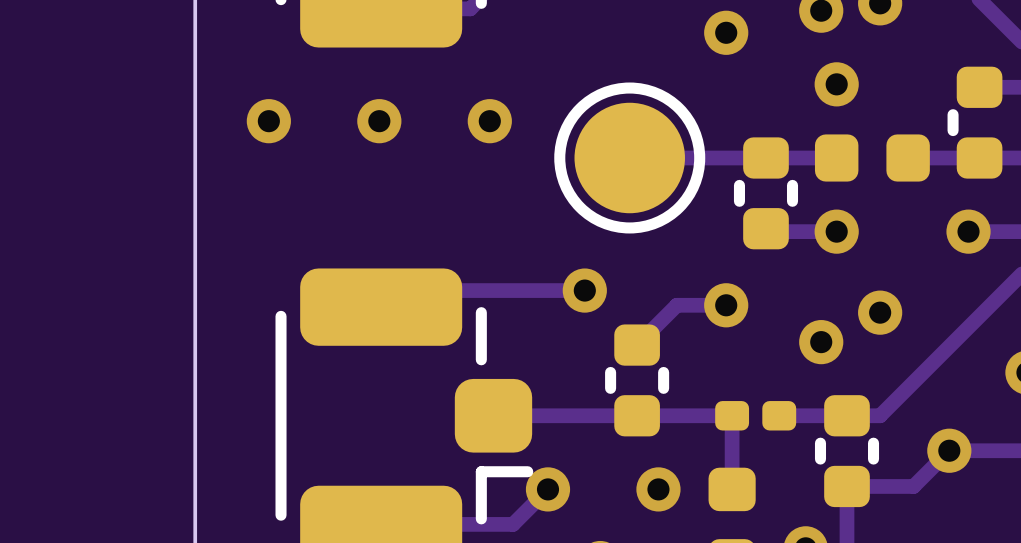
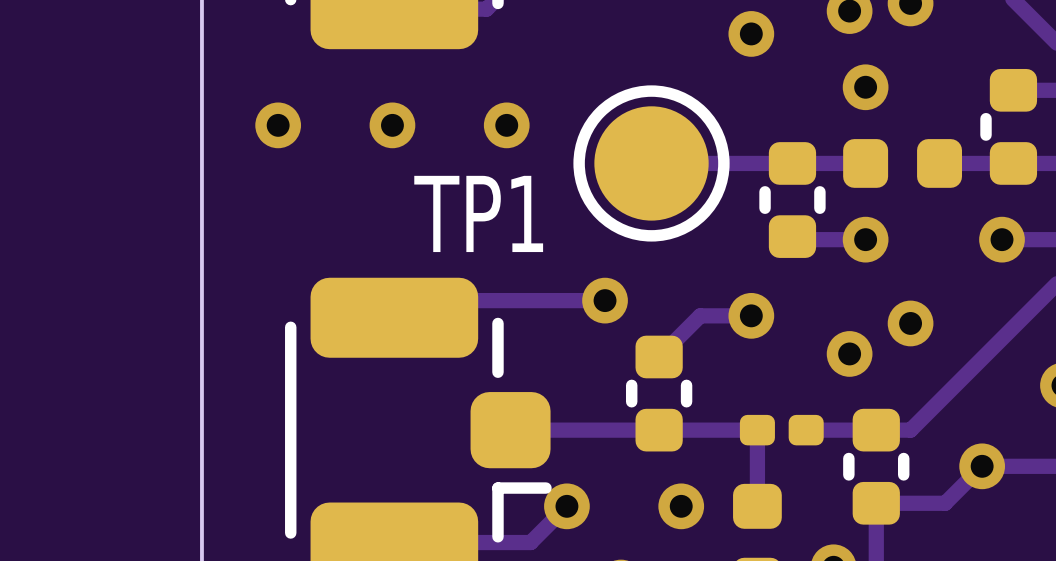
TP1 name: none -> TP1 (478, 213)

